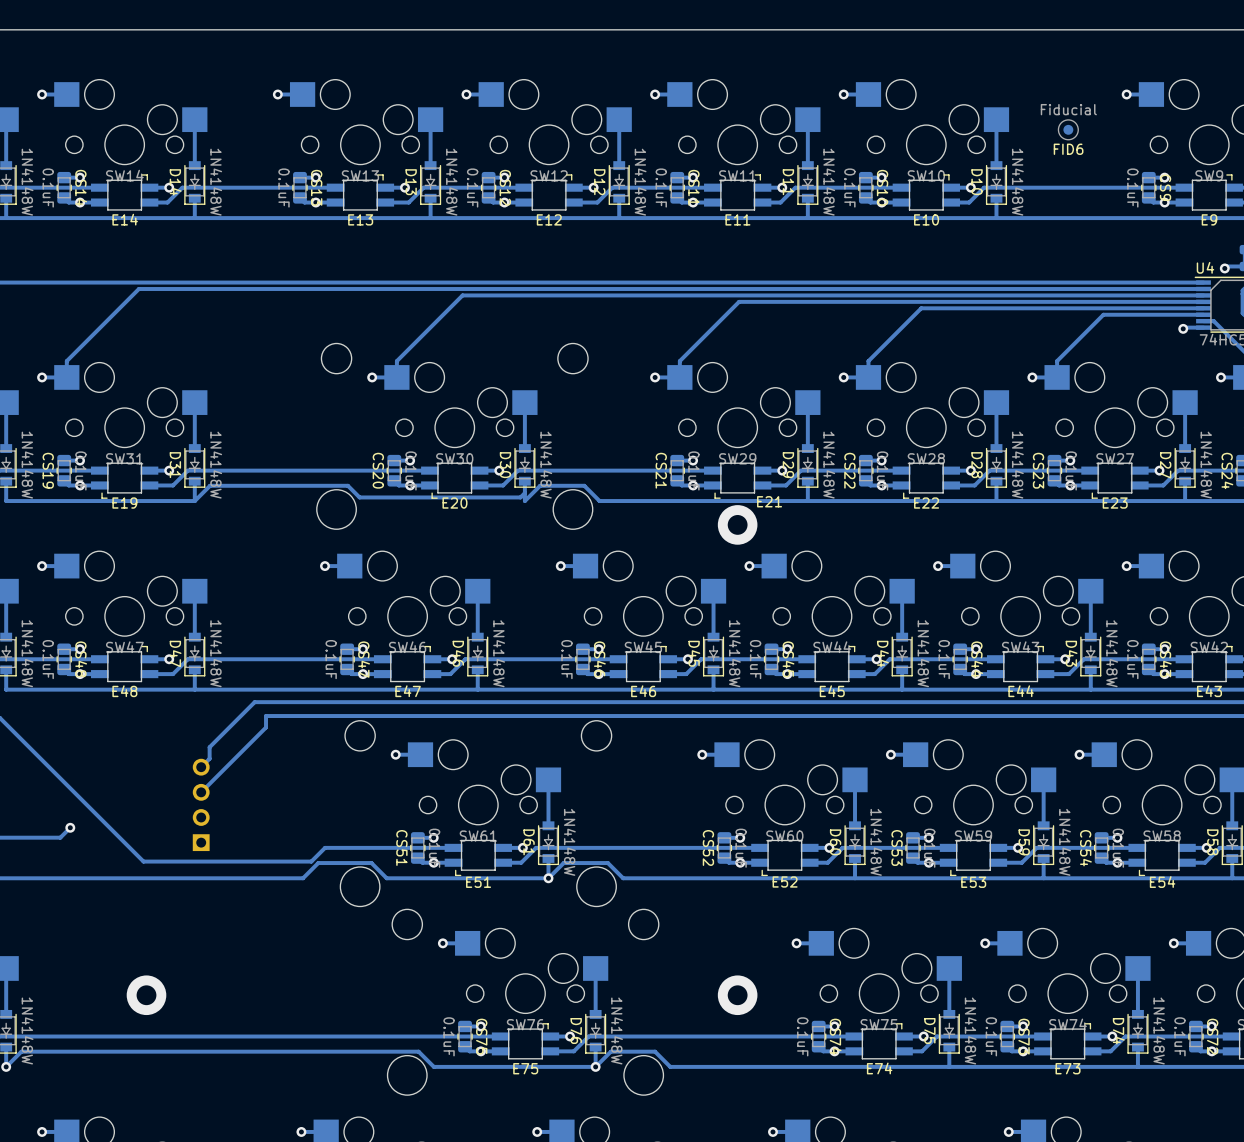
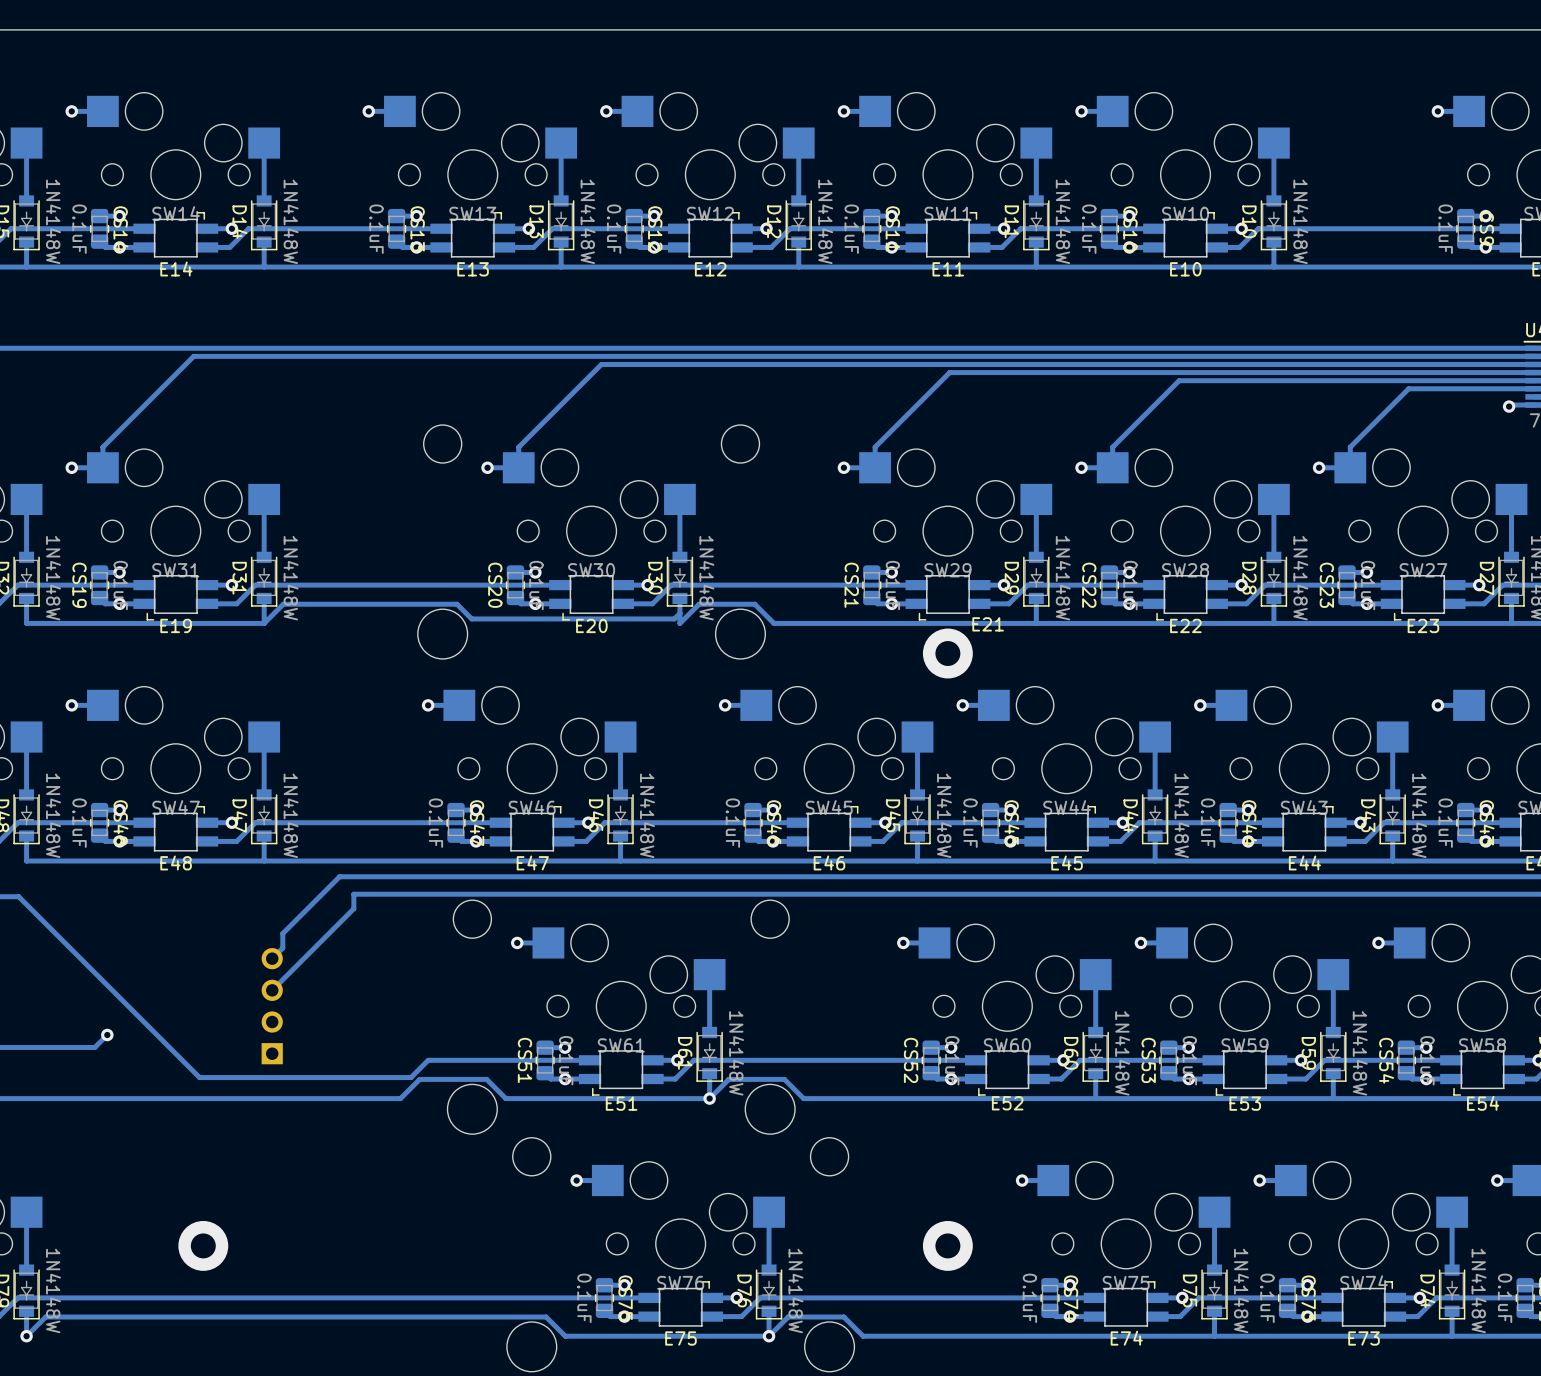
FID6: Fiducial (1068, 129) -> none

